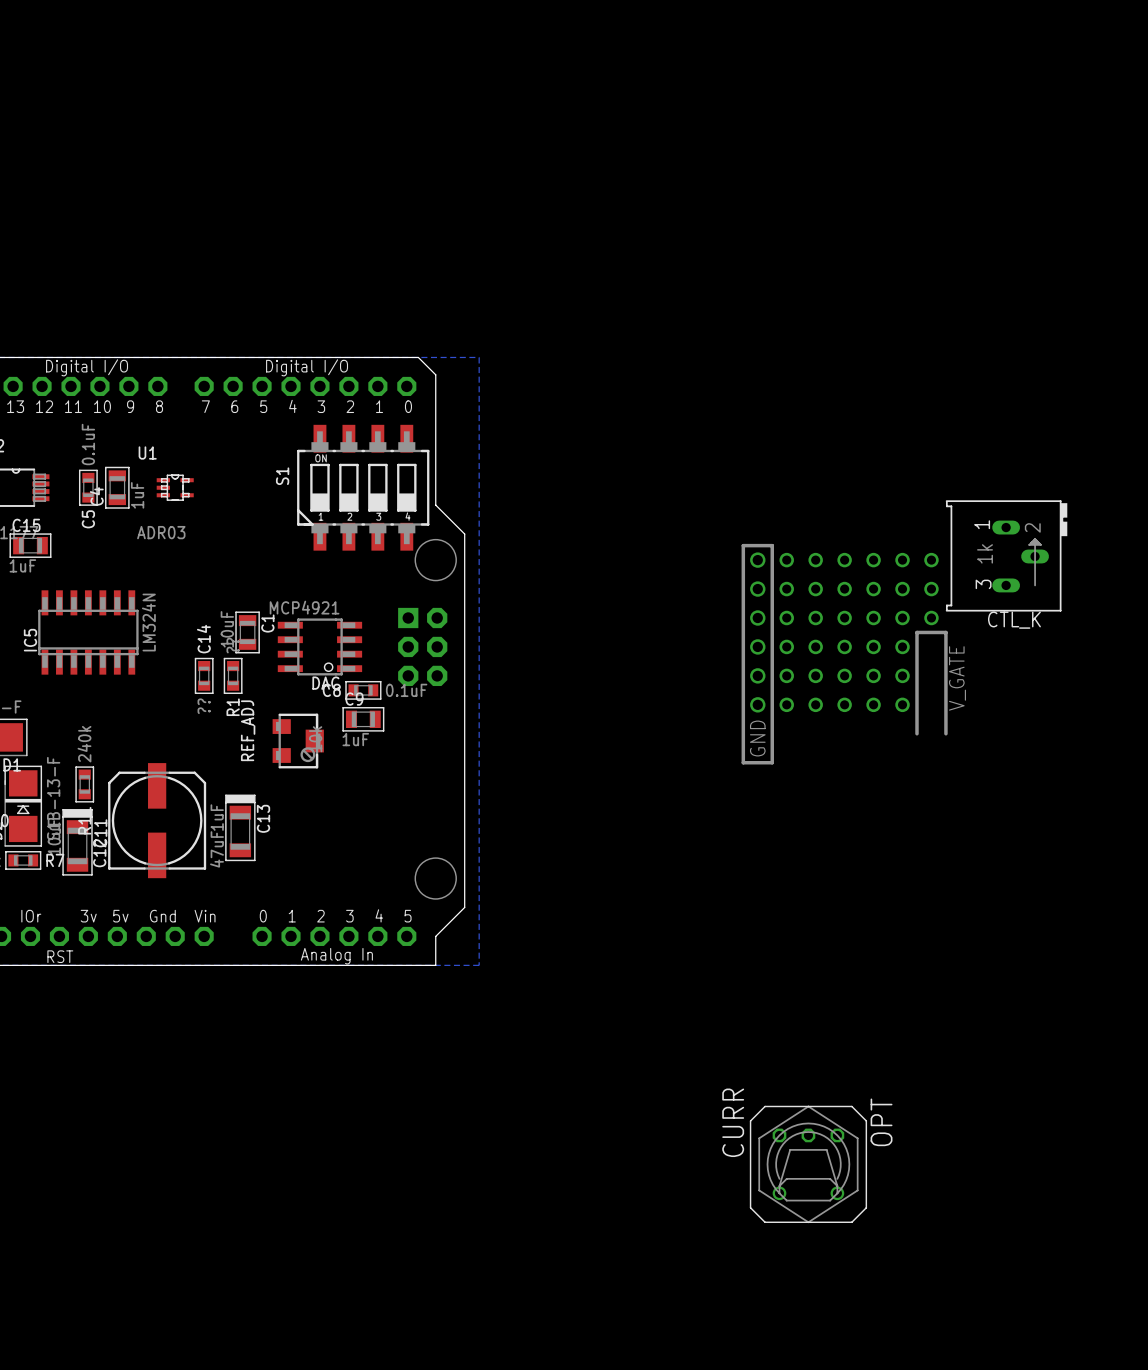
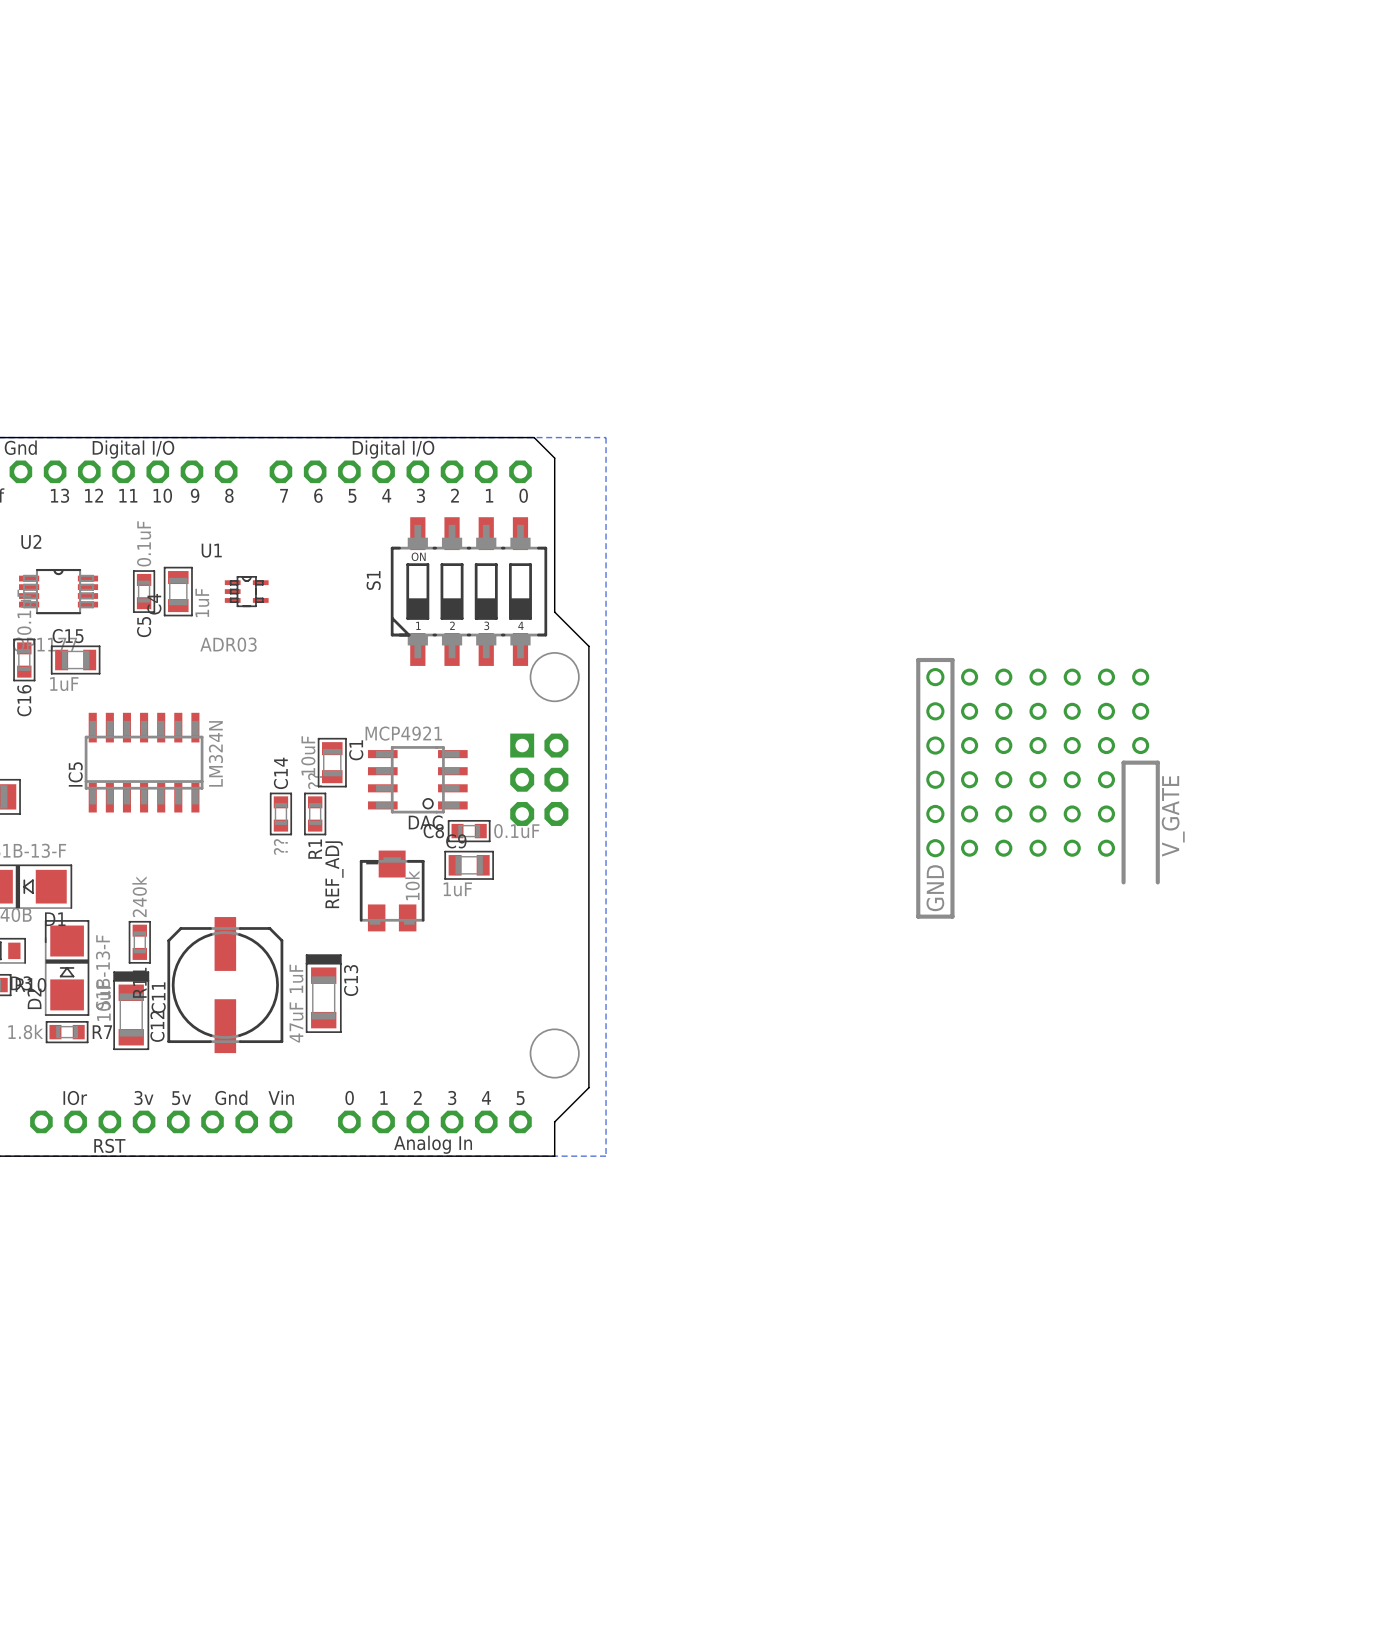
CTL_K: 1k (1006, 555) -> none
REF_ADJ footprint: [272, 713, 324, 769] -> [359, 850, 425, 932]
text: CURR (733, 1122) -> none
text: OPT (881, 1122) -> none
part: (808, 1164) -> none

